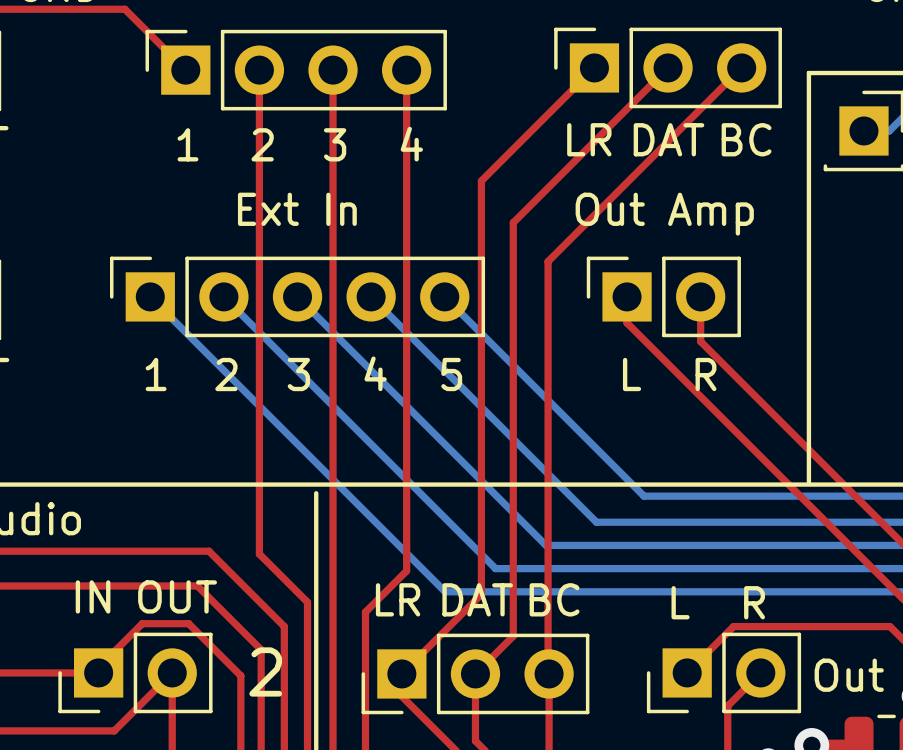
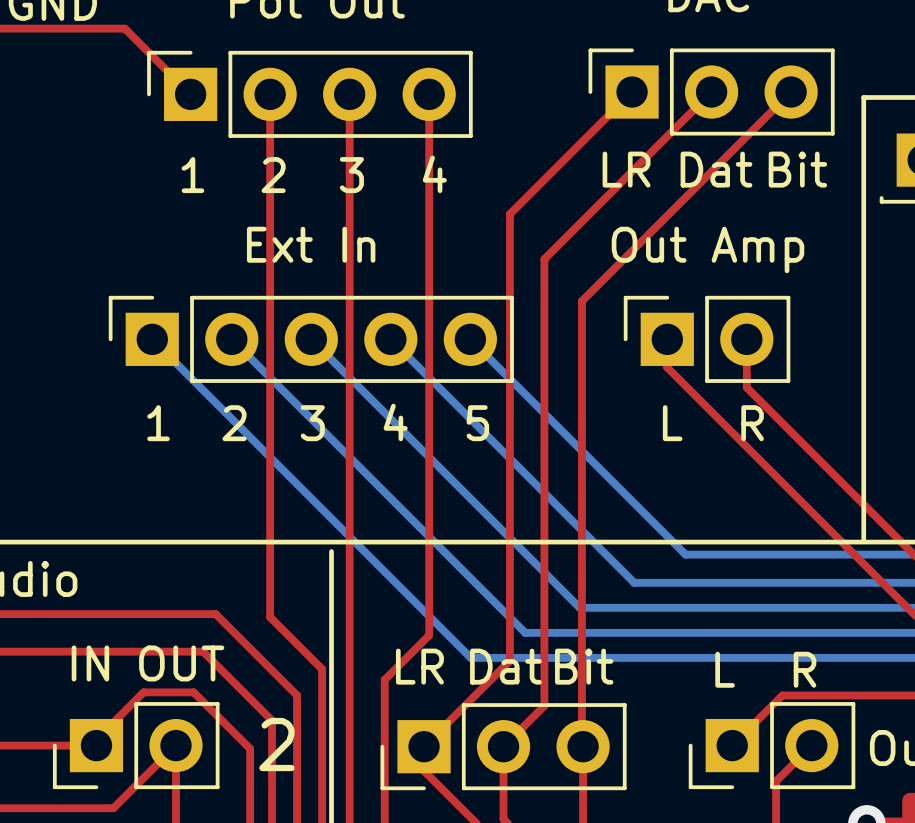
text: DAT (668, 139) -> Dat (716, 169)
text: BC (746, 139) -> Bit (797, 169)
text: DAT (477, 599) -> Dat (505, 666)
text: BC (554, 599) -> Bit (584, 666)

